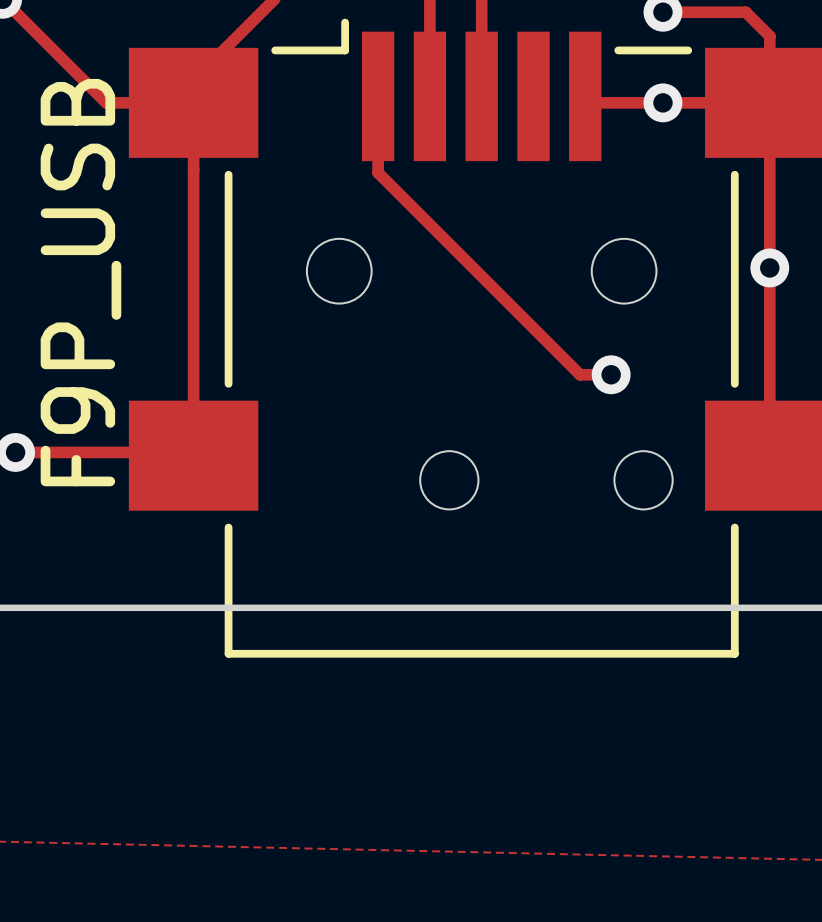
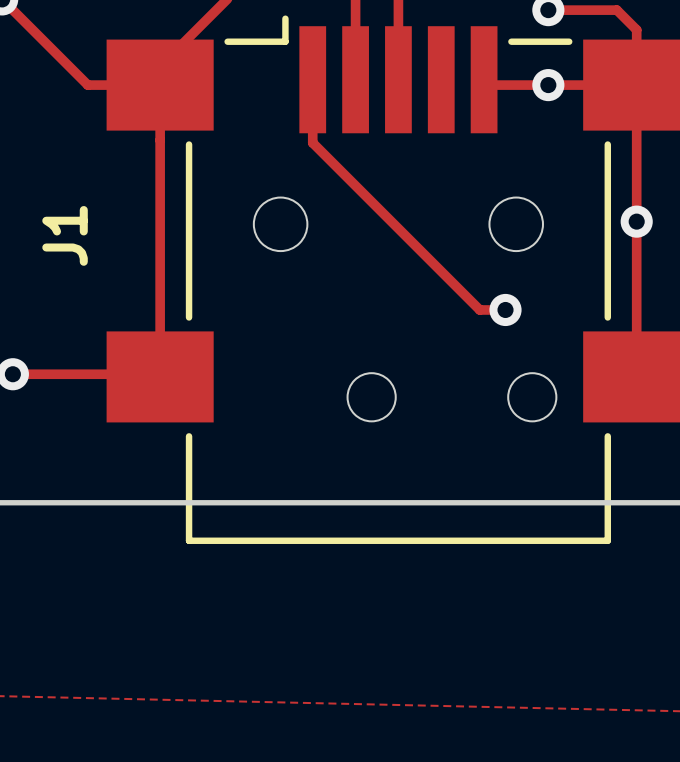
F9P_USB name: F9P_USB (80, 282) -> J1 (65, 235)

